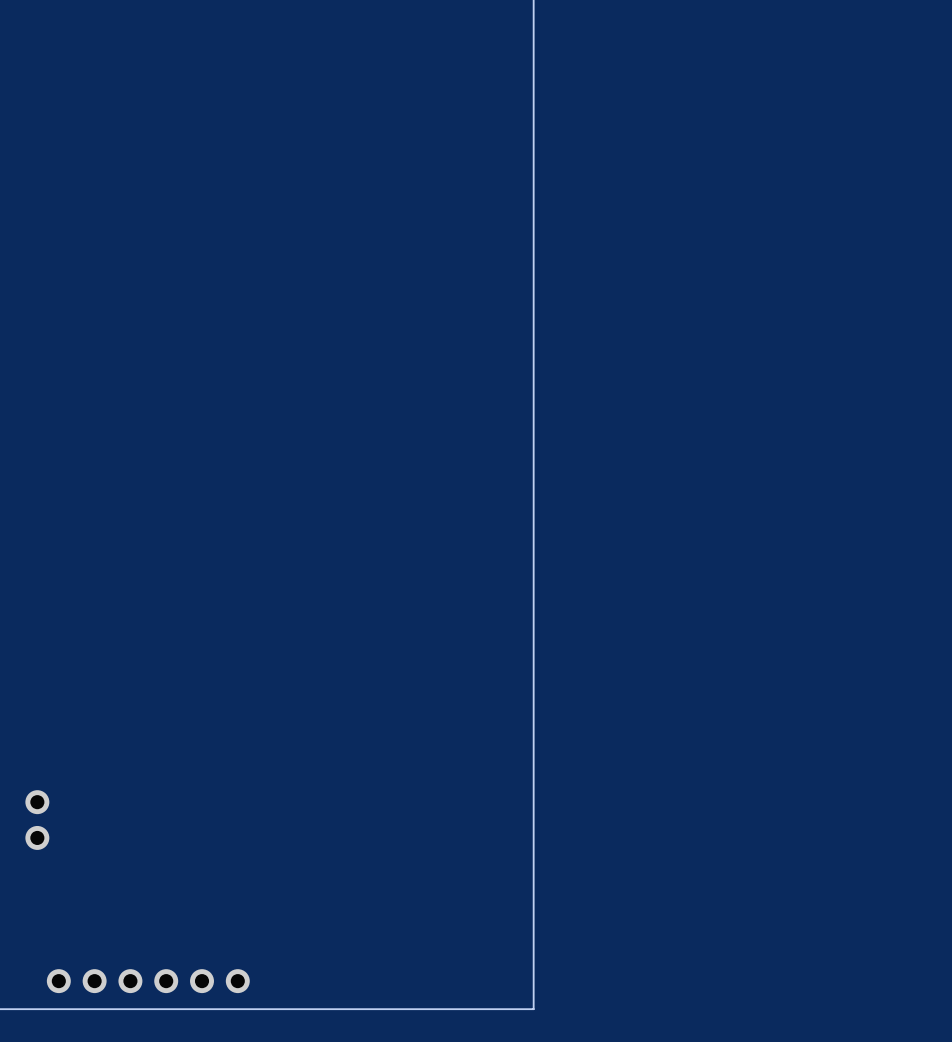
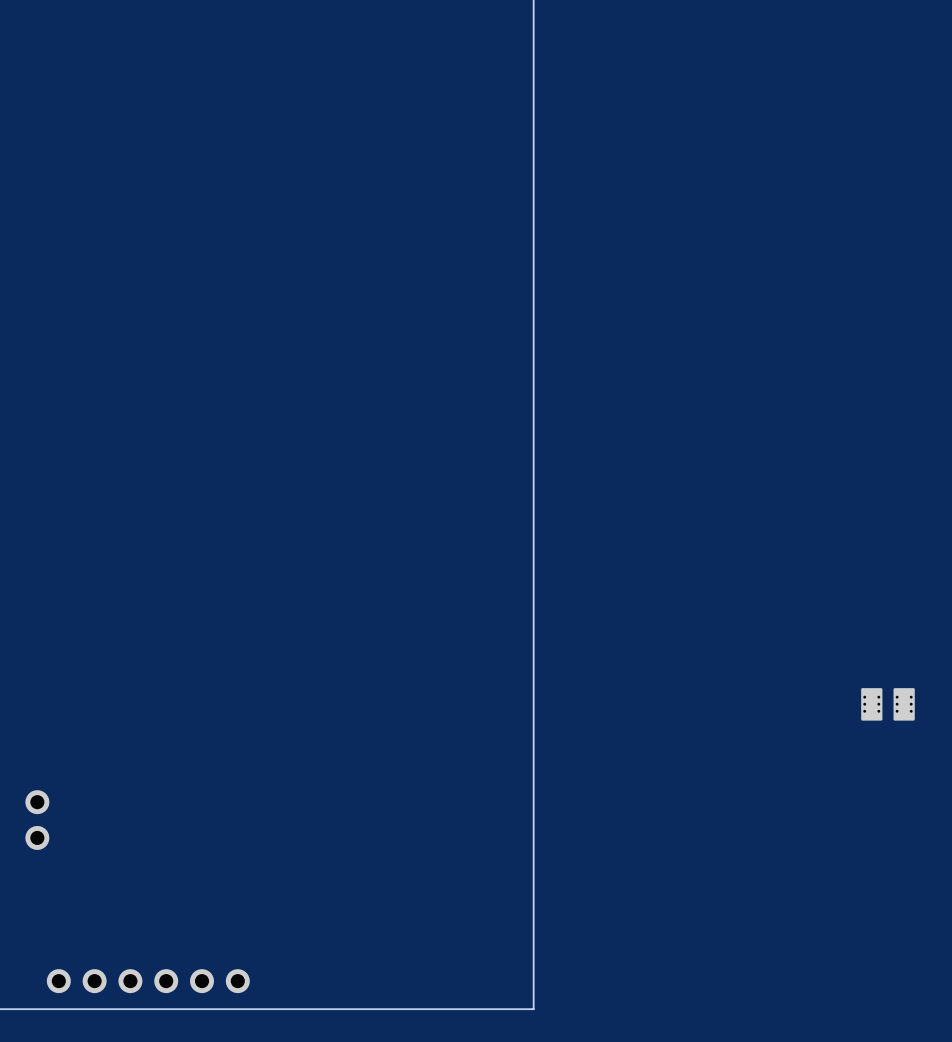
part: none -> (887, 704)

